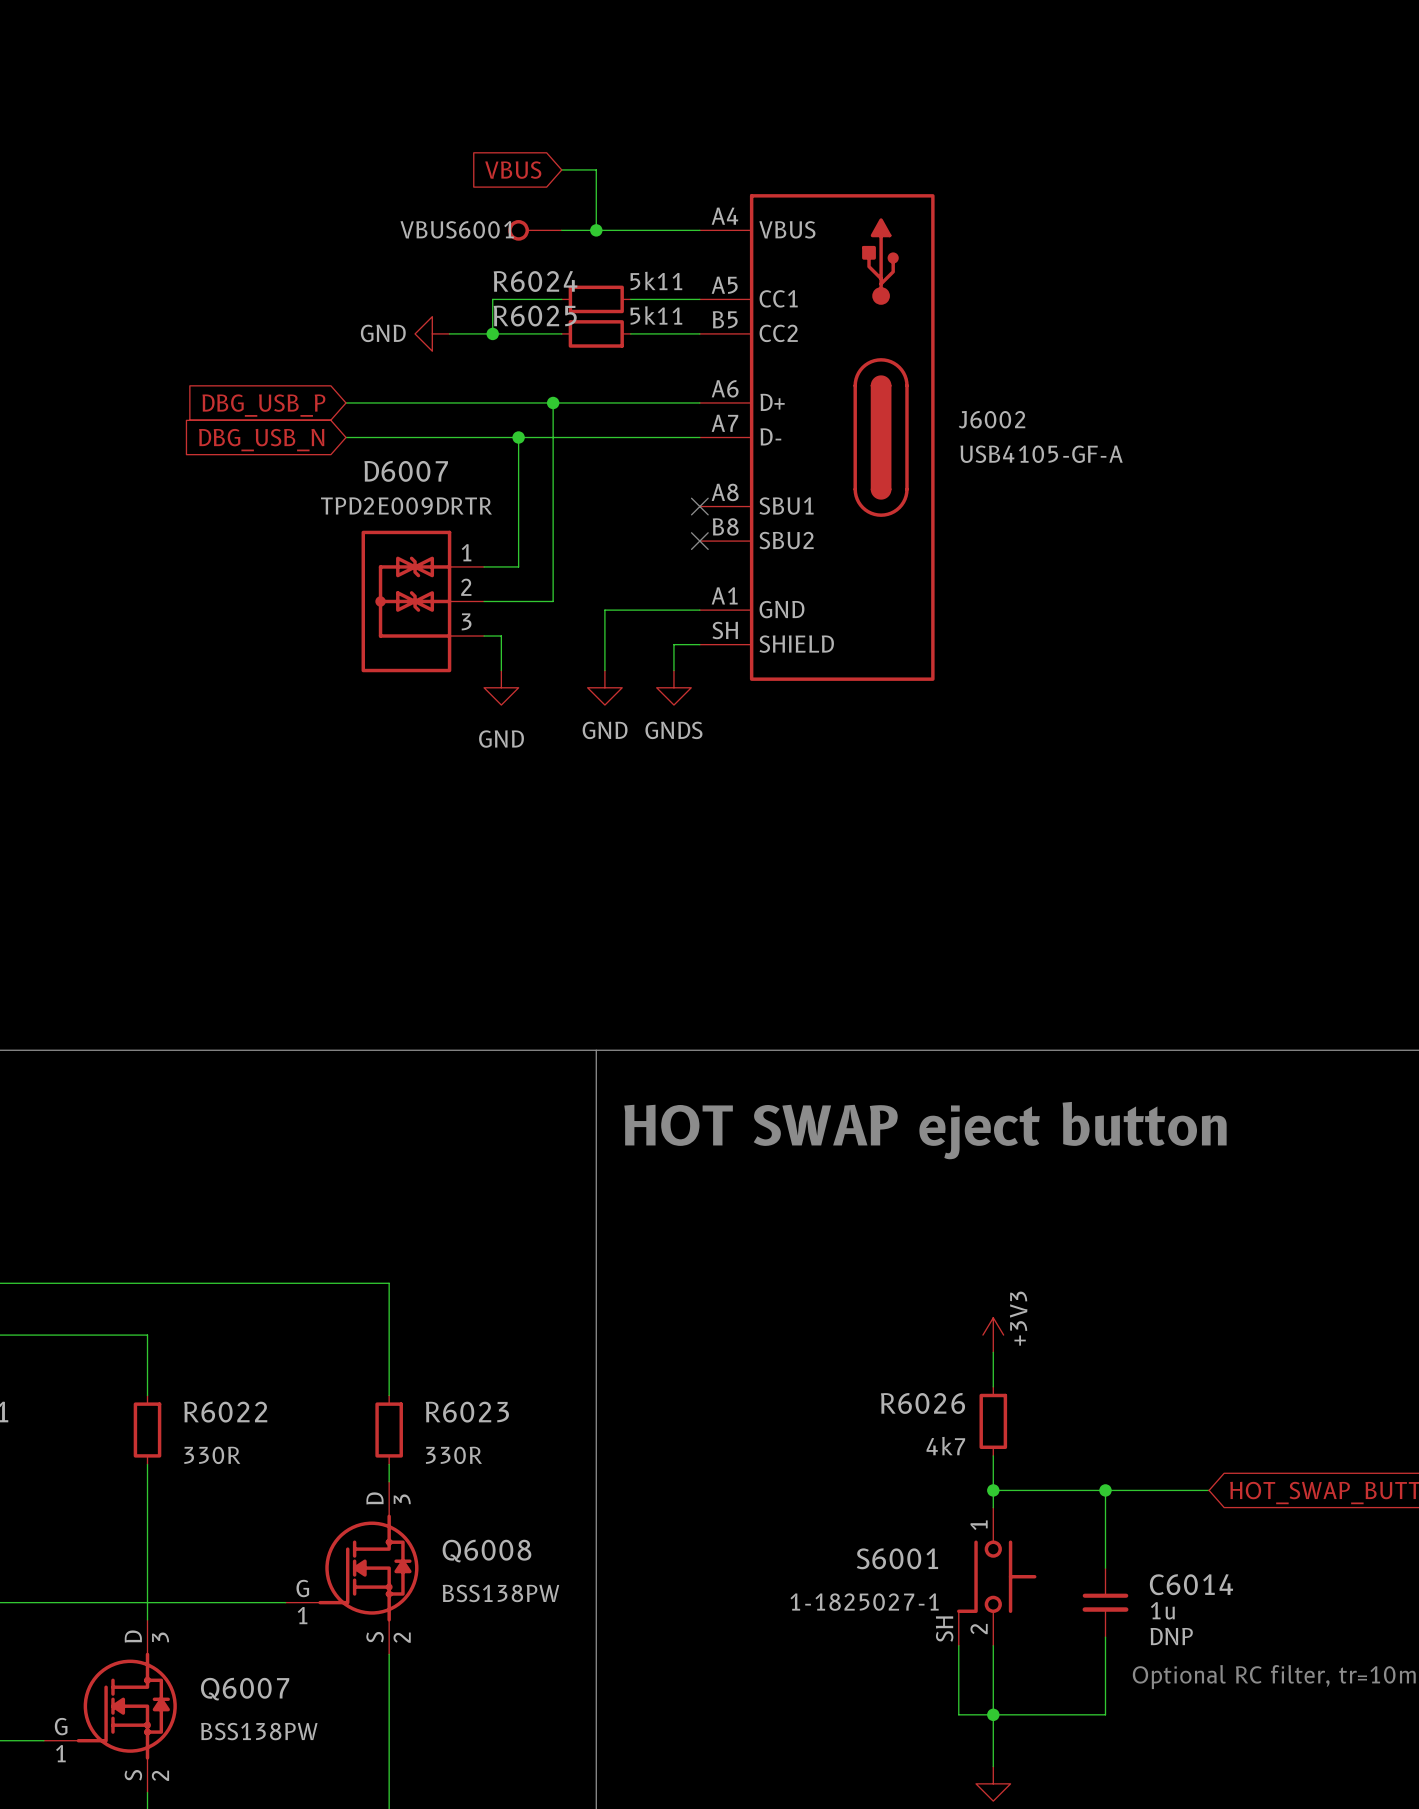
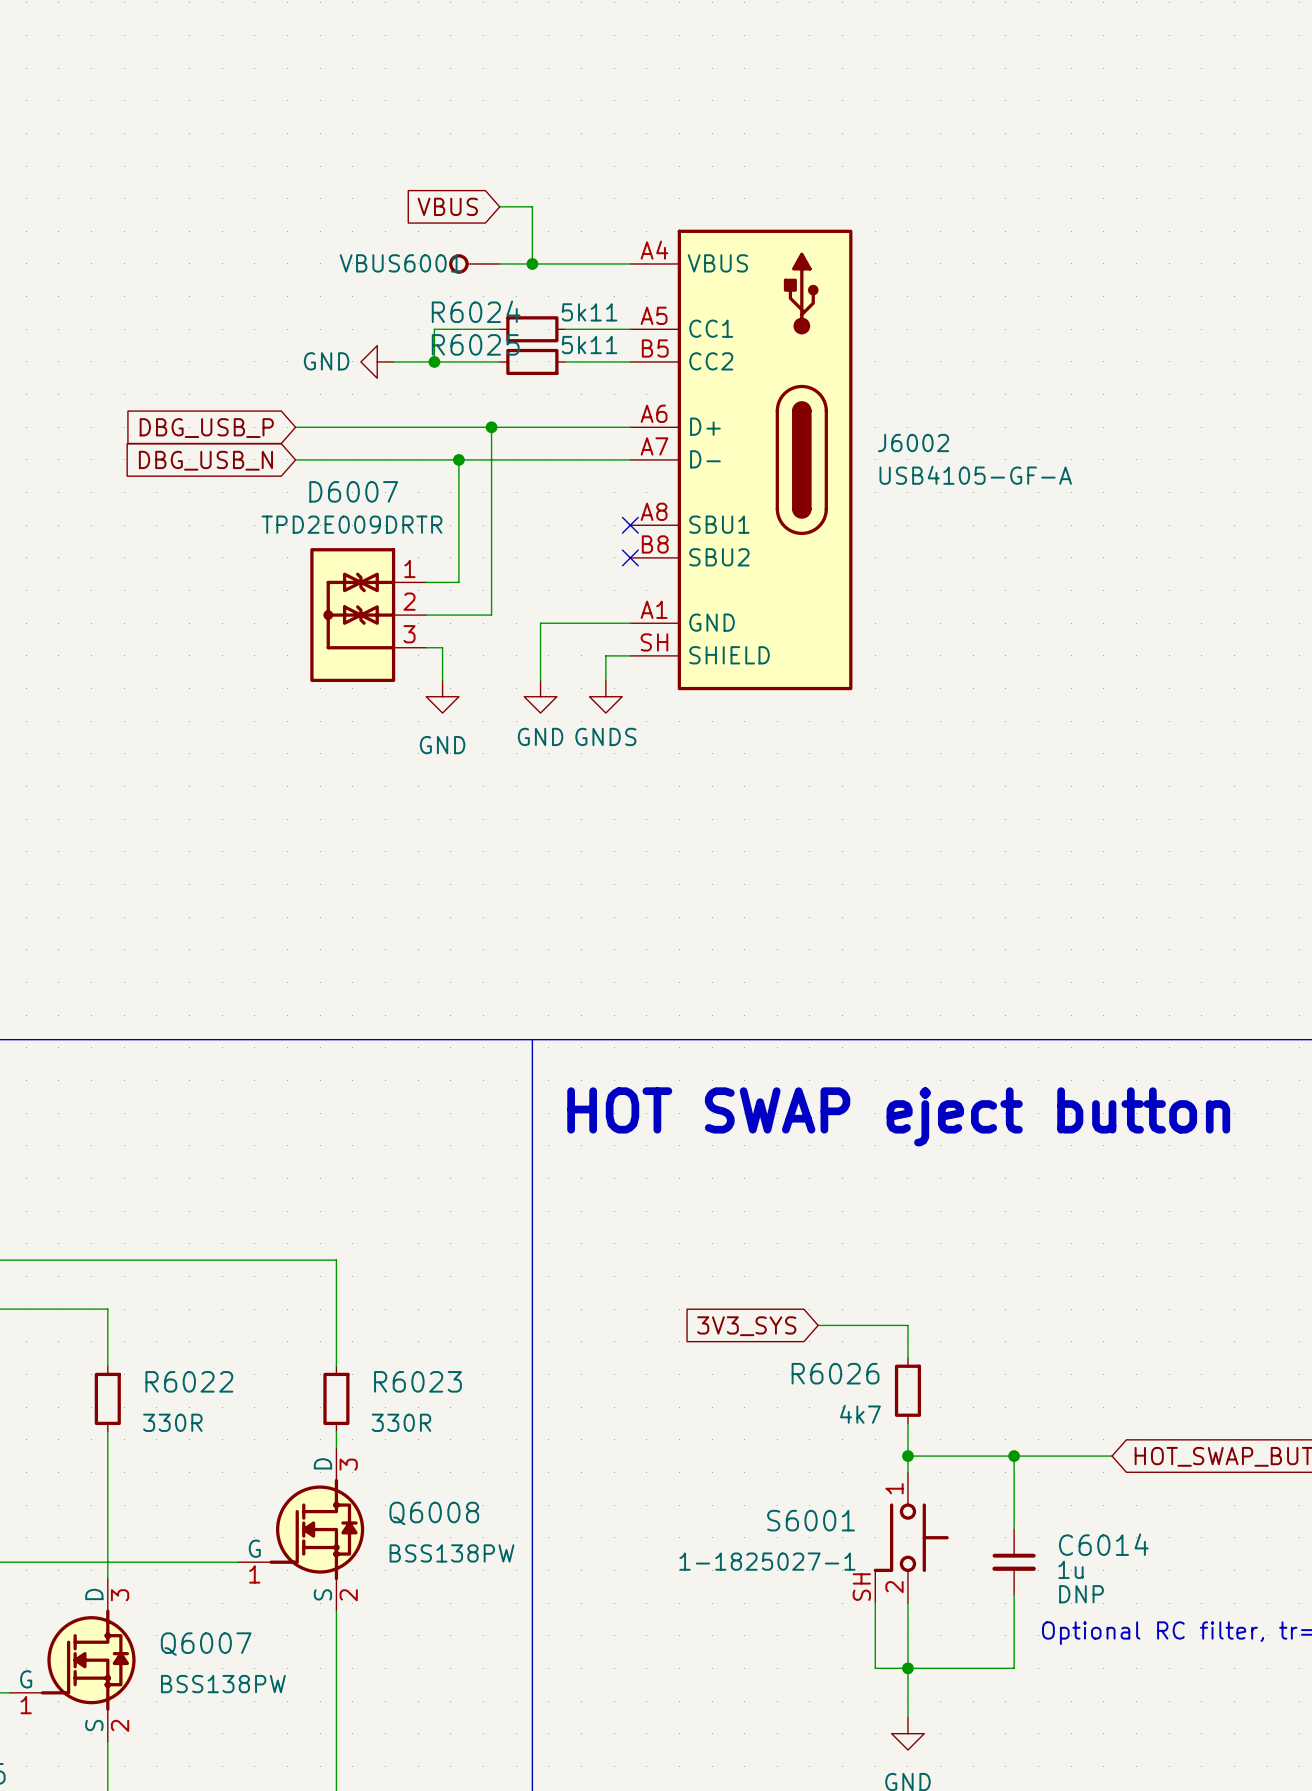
power symbol: +3V3 (993, 1335) -> none
wire: none -> (818, 1325) (907, 1325)
global label: none -> 3V3_SYS (746, 1326)

